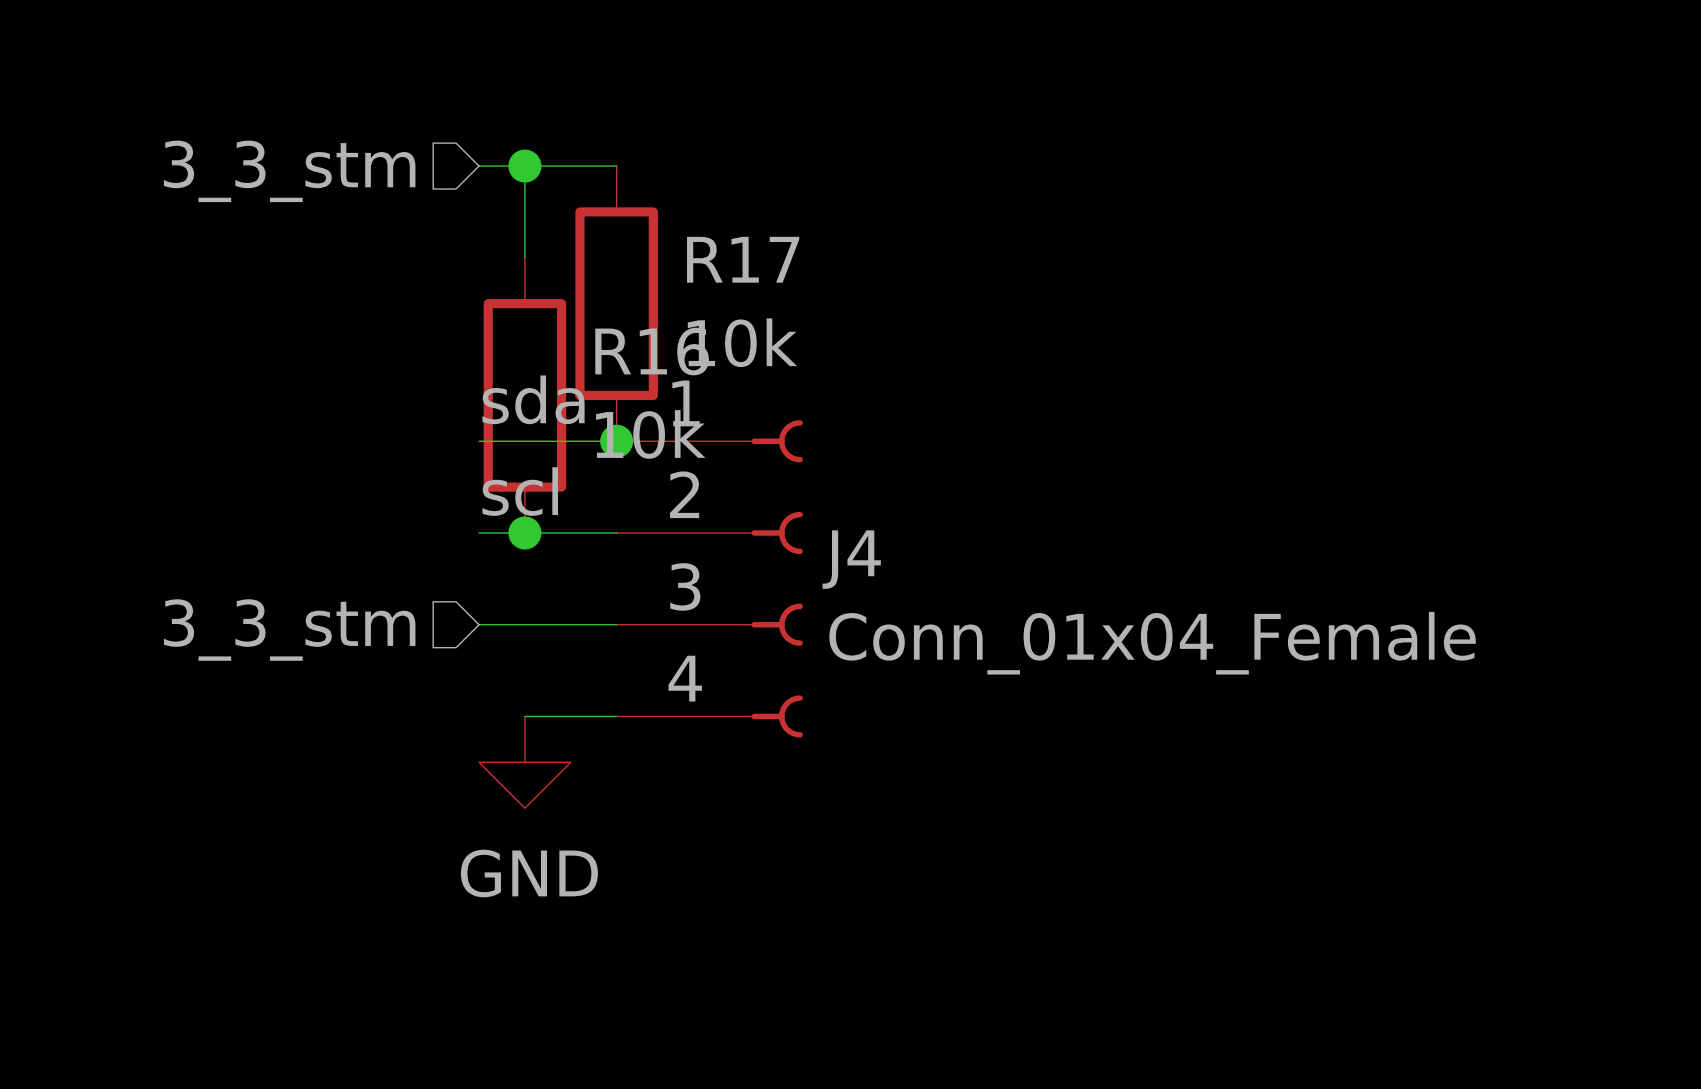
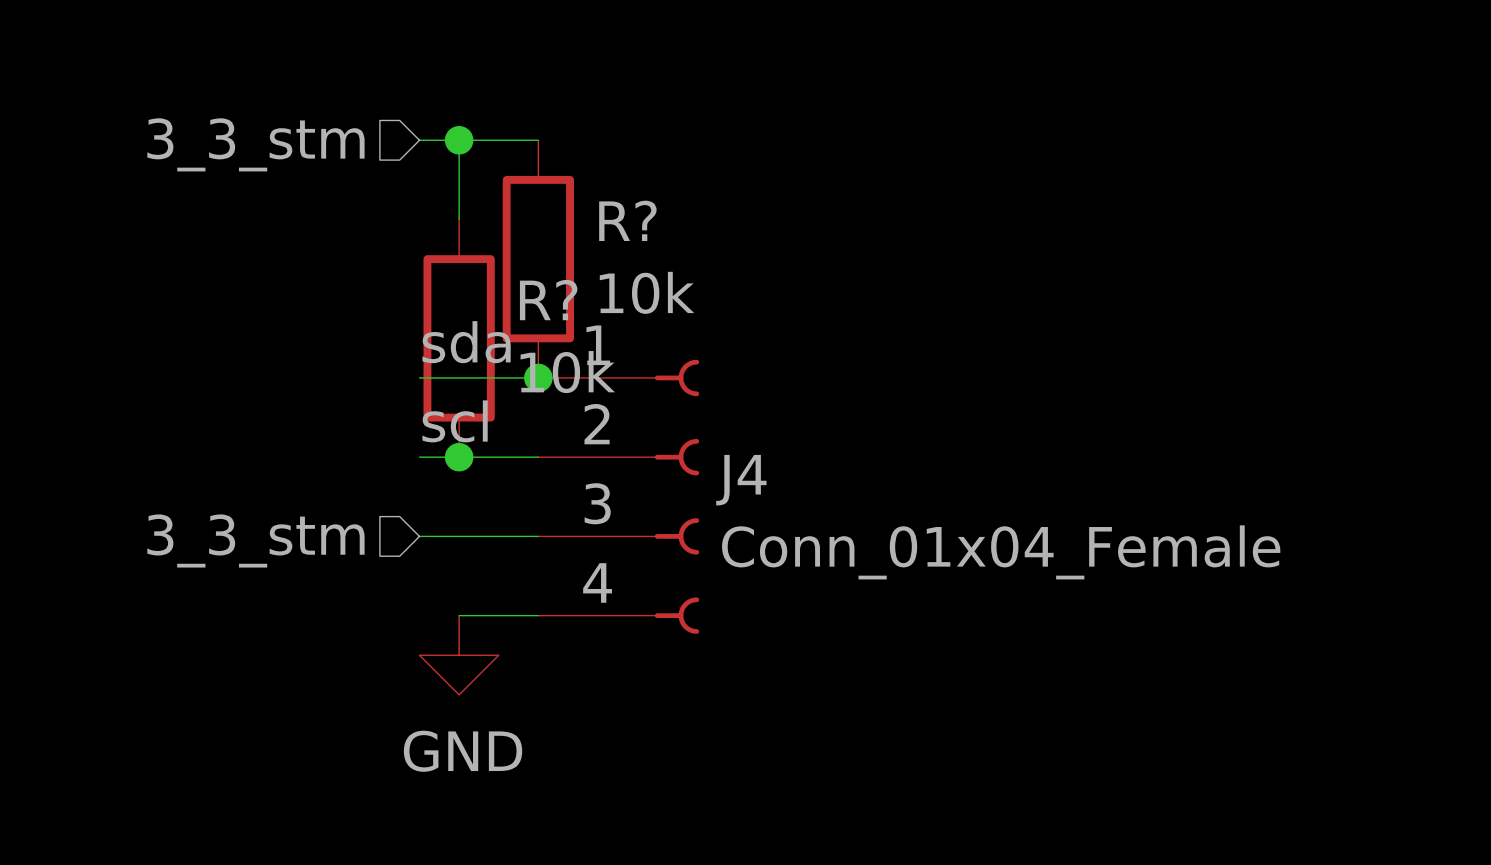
R17 name: R17 (743, 259) -> R? (627, 220)
R16 name: R16 (652, 351) -> R? (548, 300)

